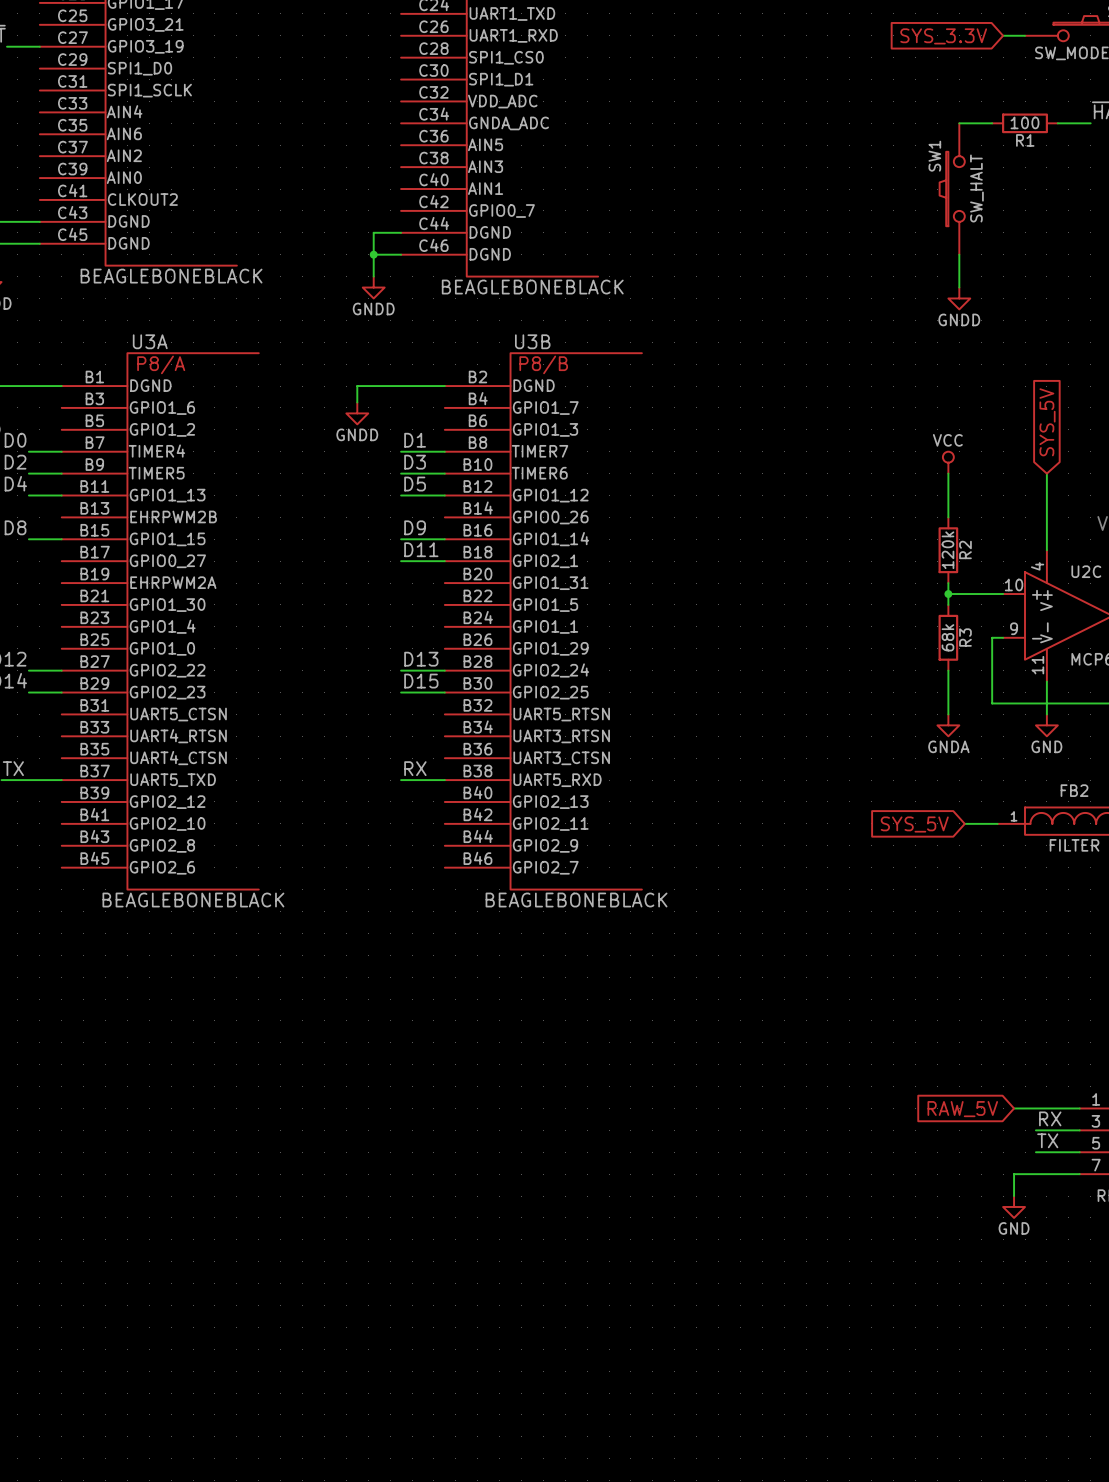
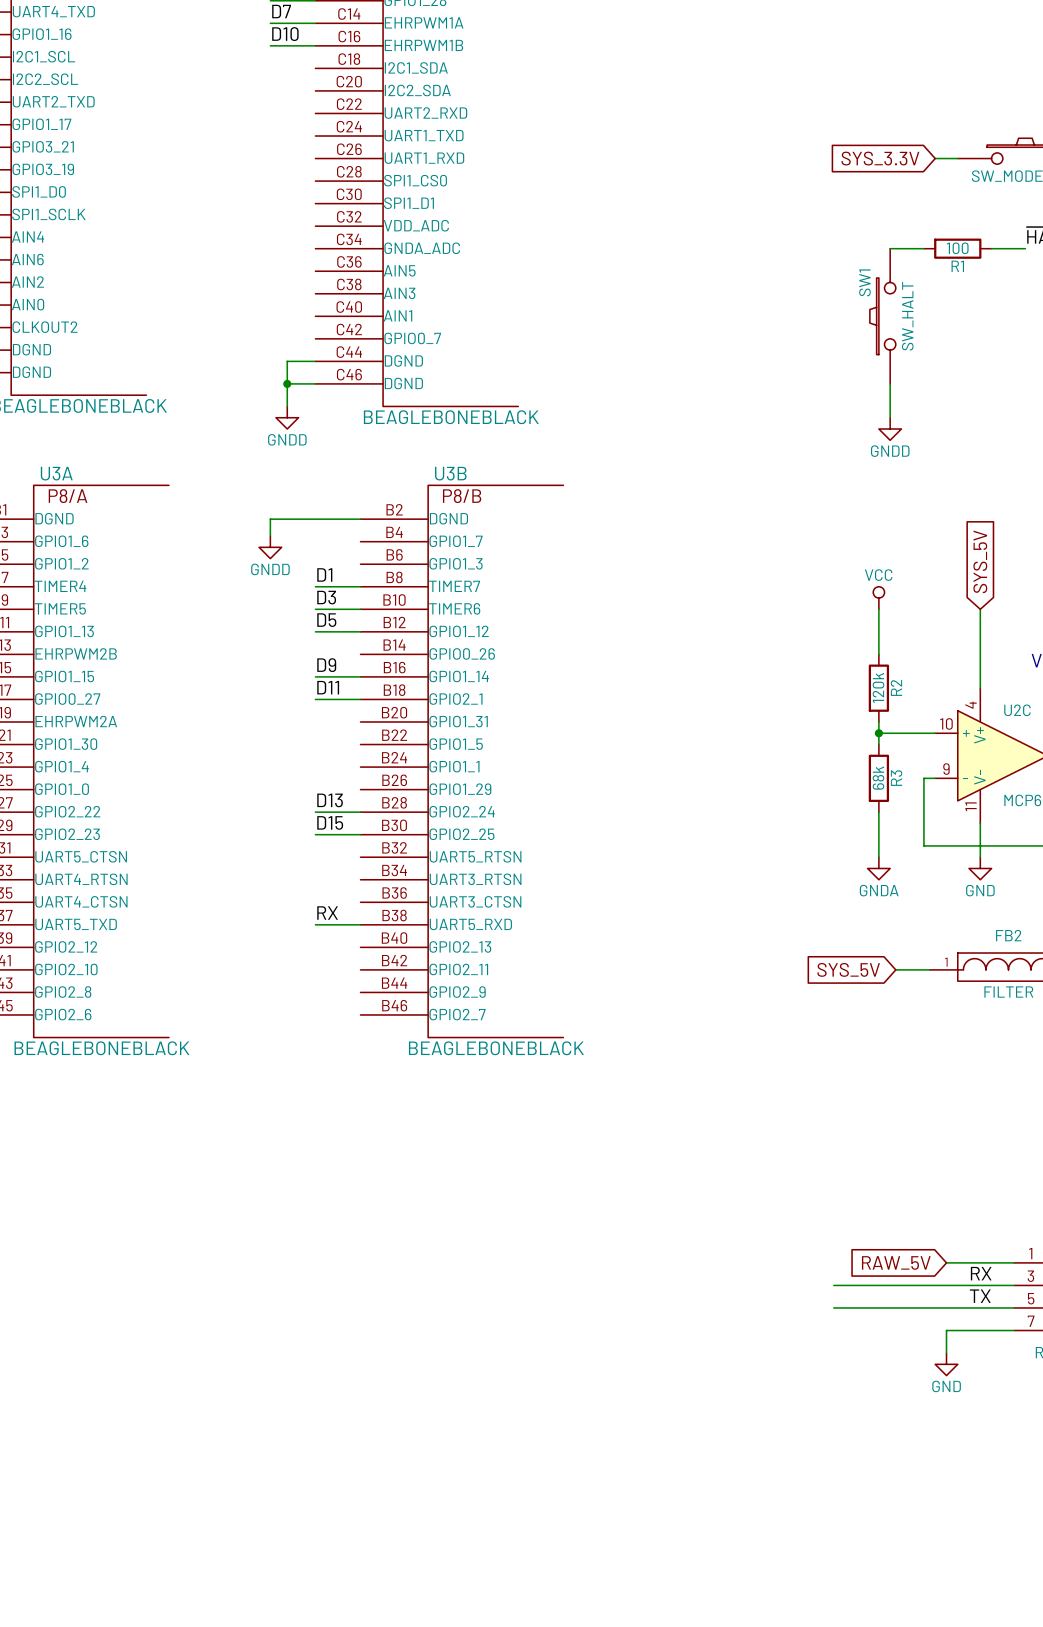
wire: none -> (833, 1285) (969, 1285)
wire: none -> (833, 1307) (969, 1307)

